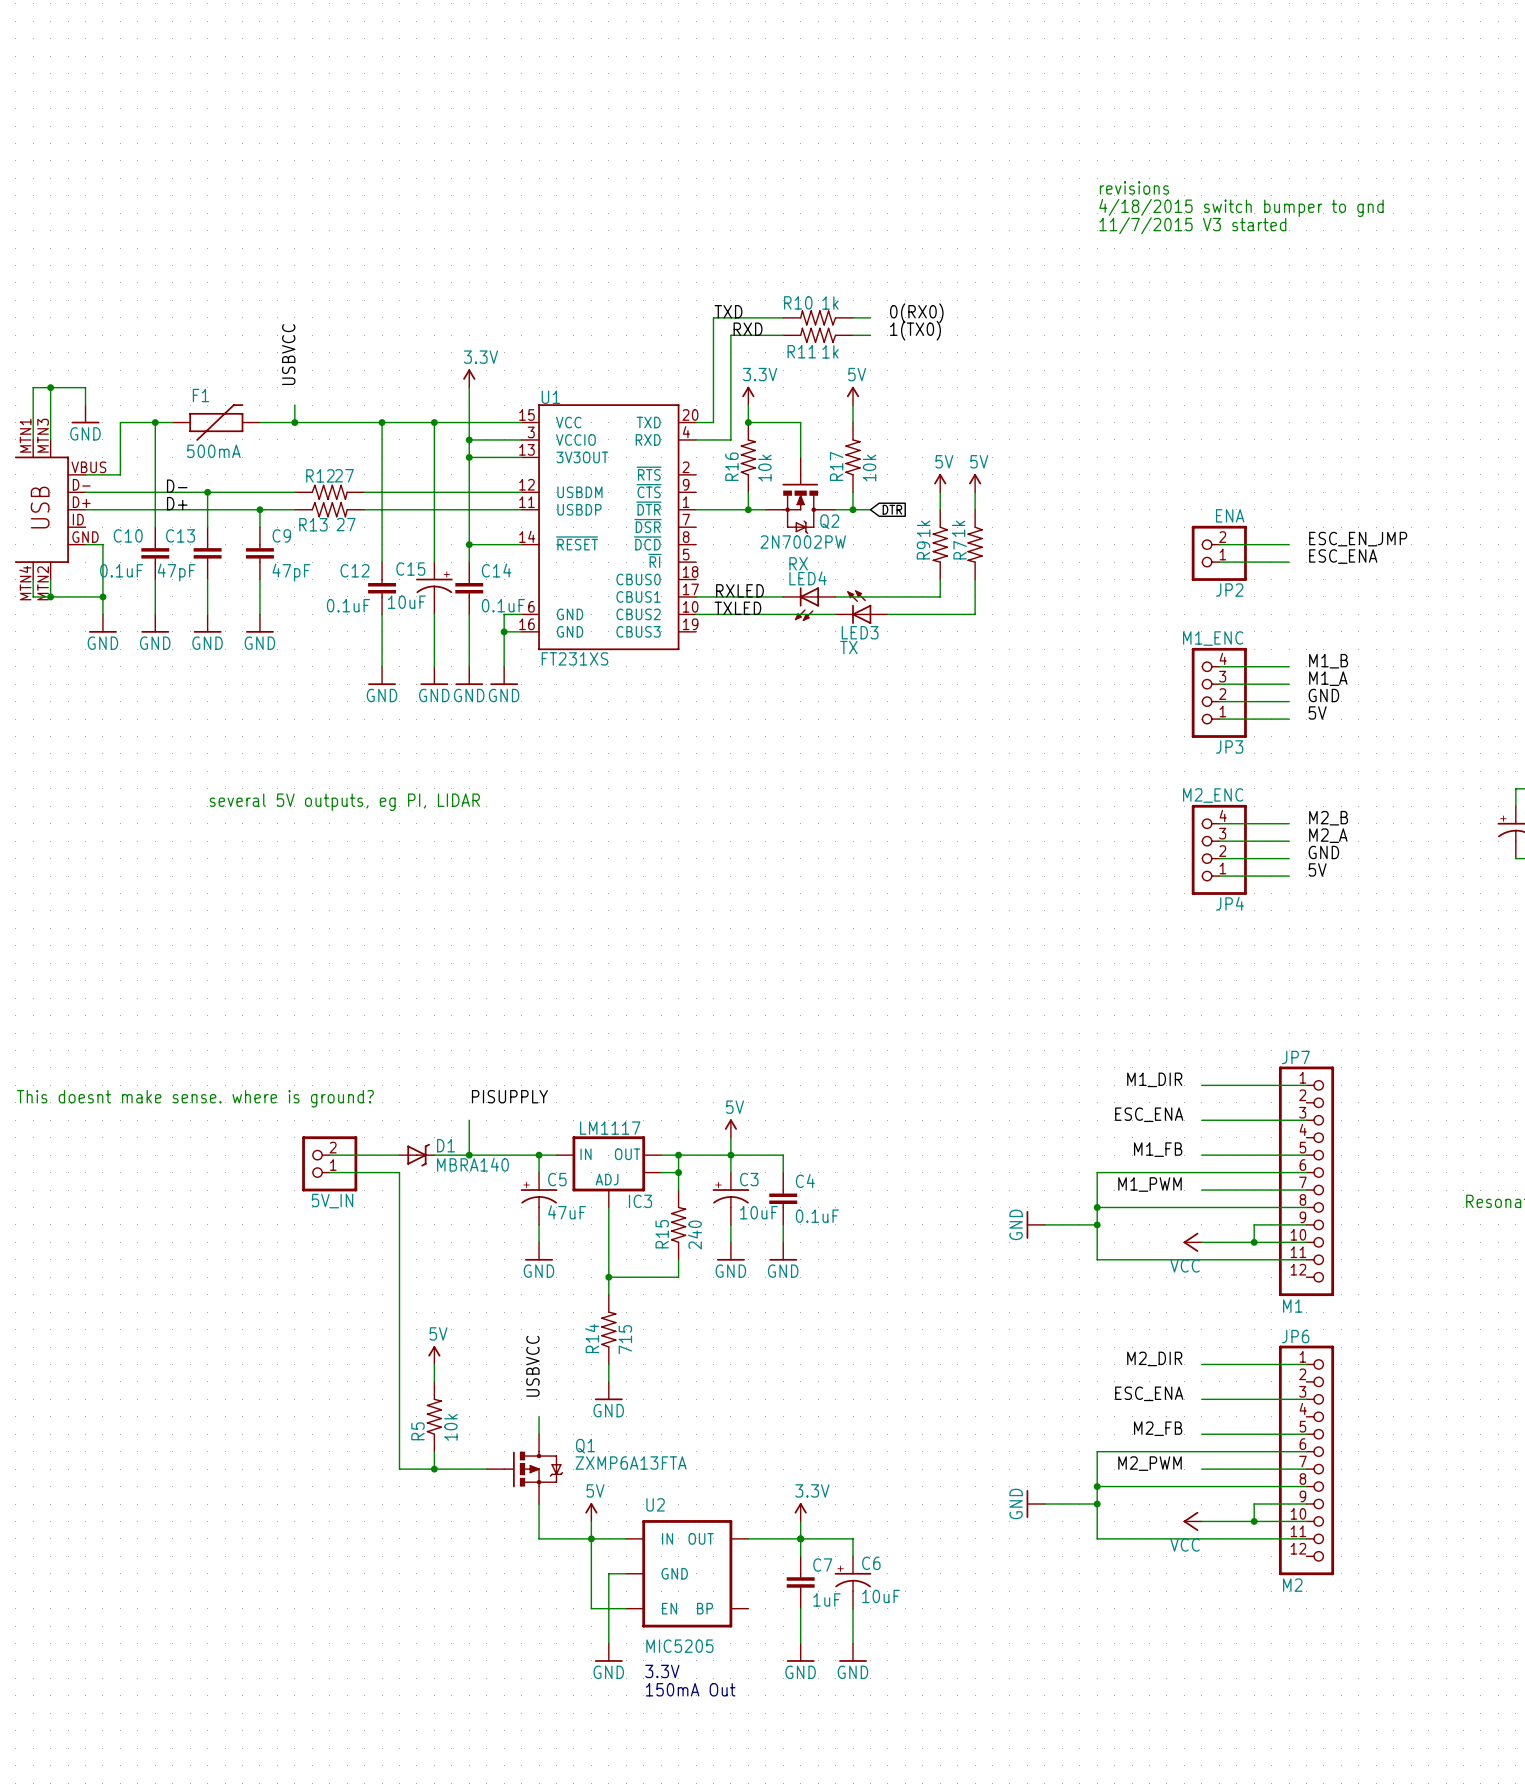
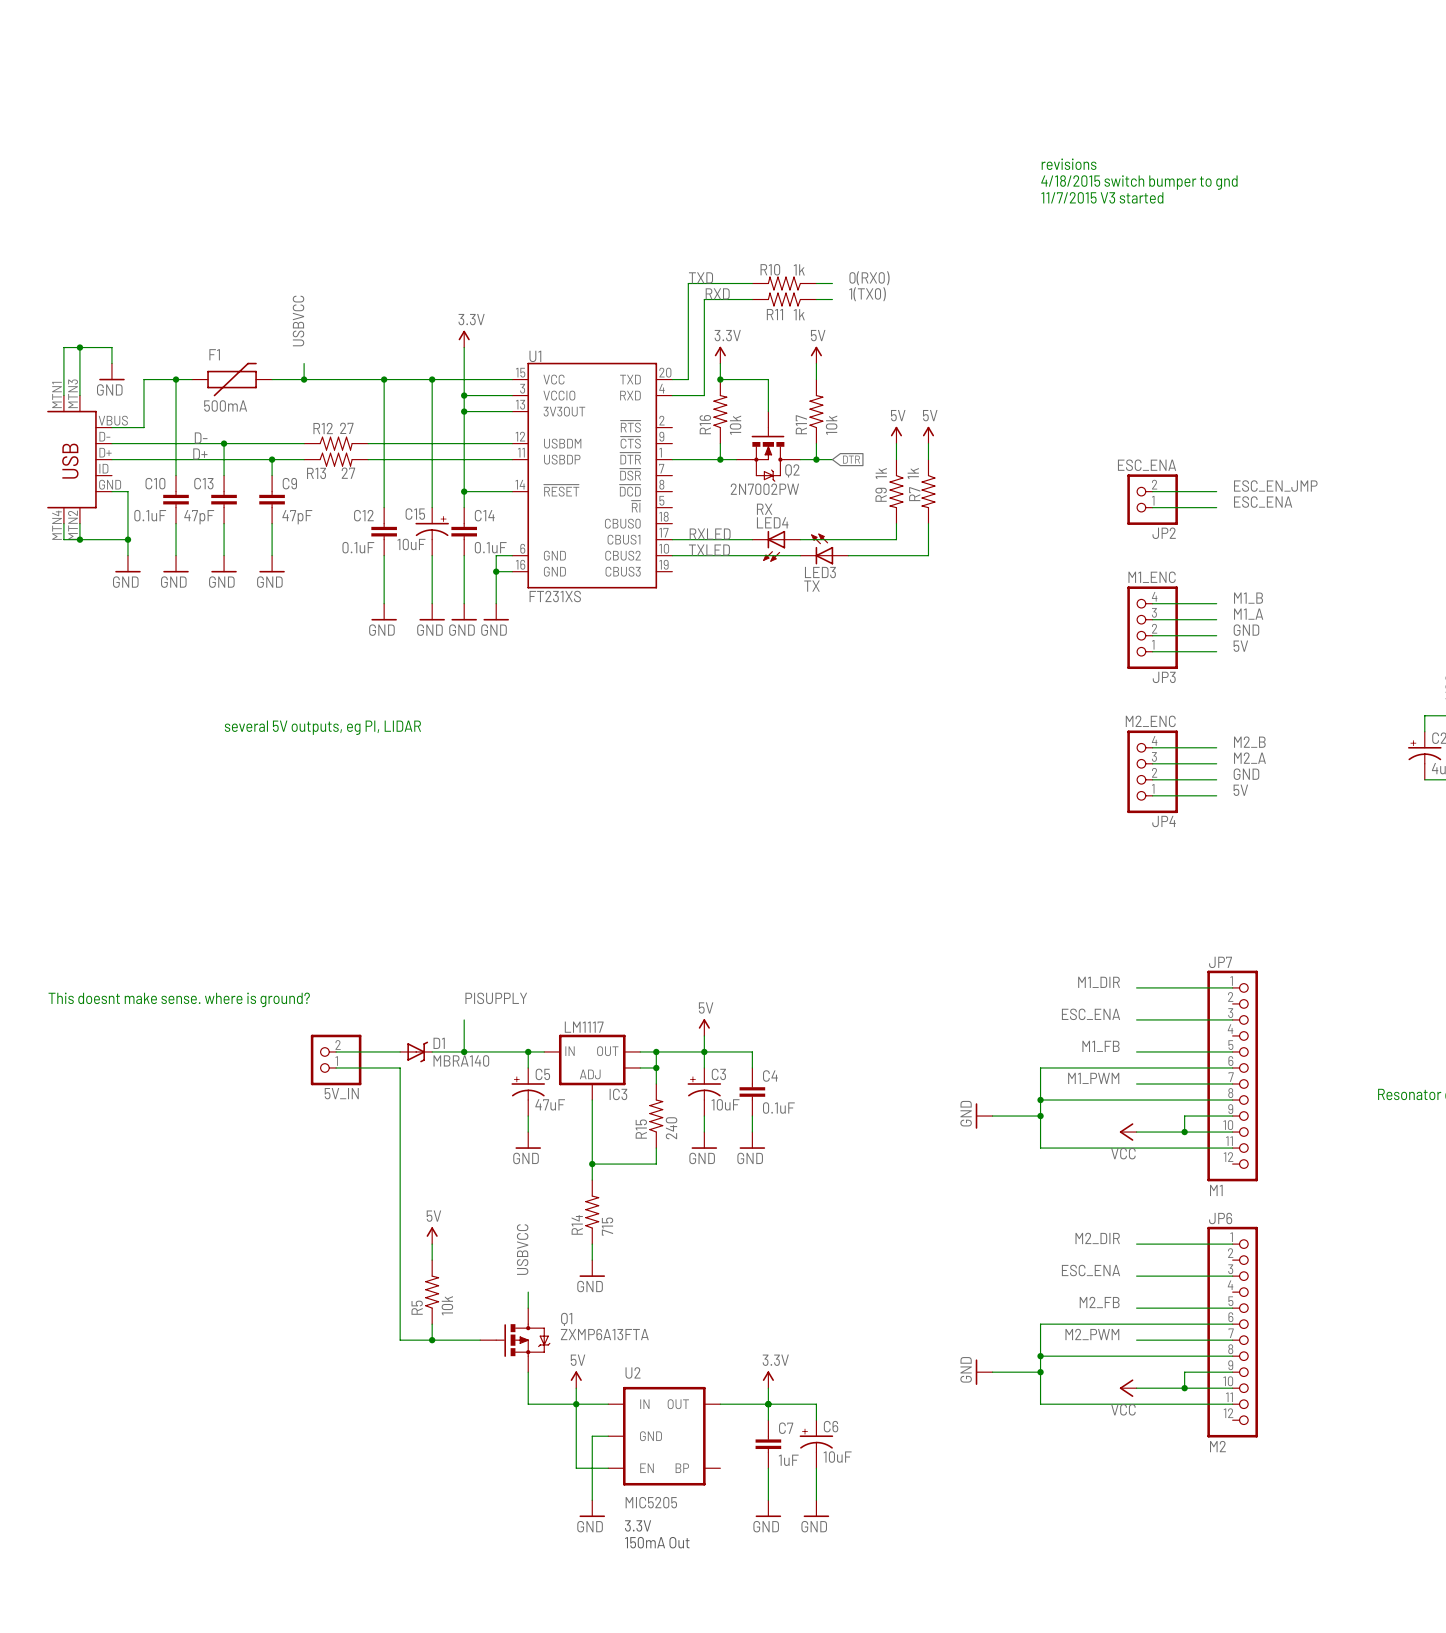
JP2 value: ENA (1230, 515) -> ESC_ENA (1147, 465)

